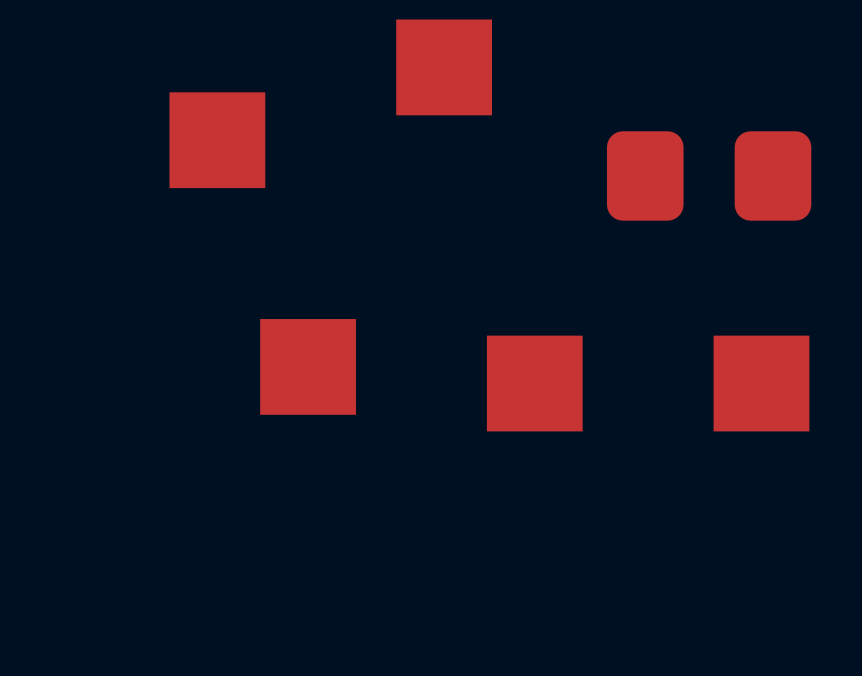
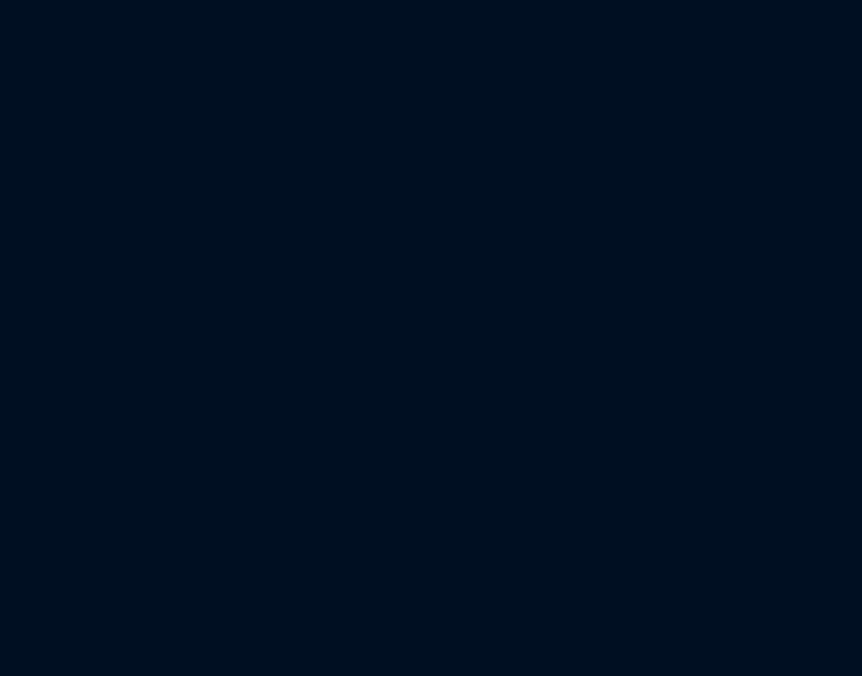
part: (444, 67) -> none
part: (217, 140) -> none
part: (709, 175) -> none
part: (308, 366) -> none
part: (534, 383) -> none
part: (761, 383) -> none

